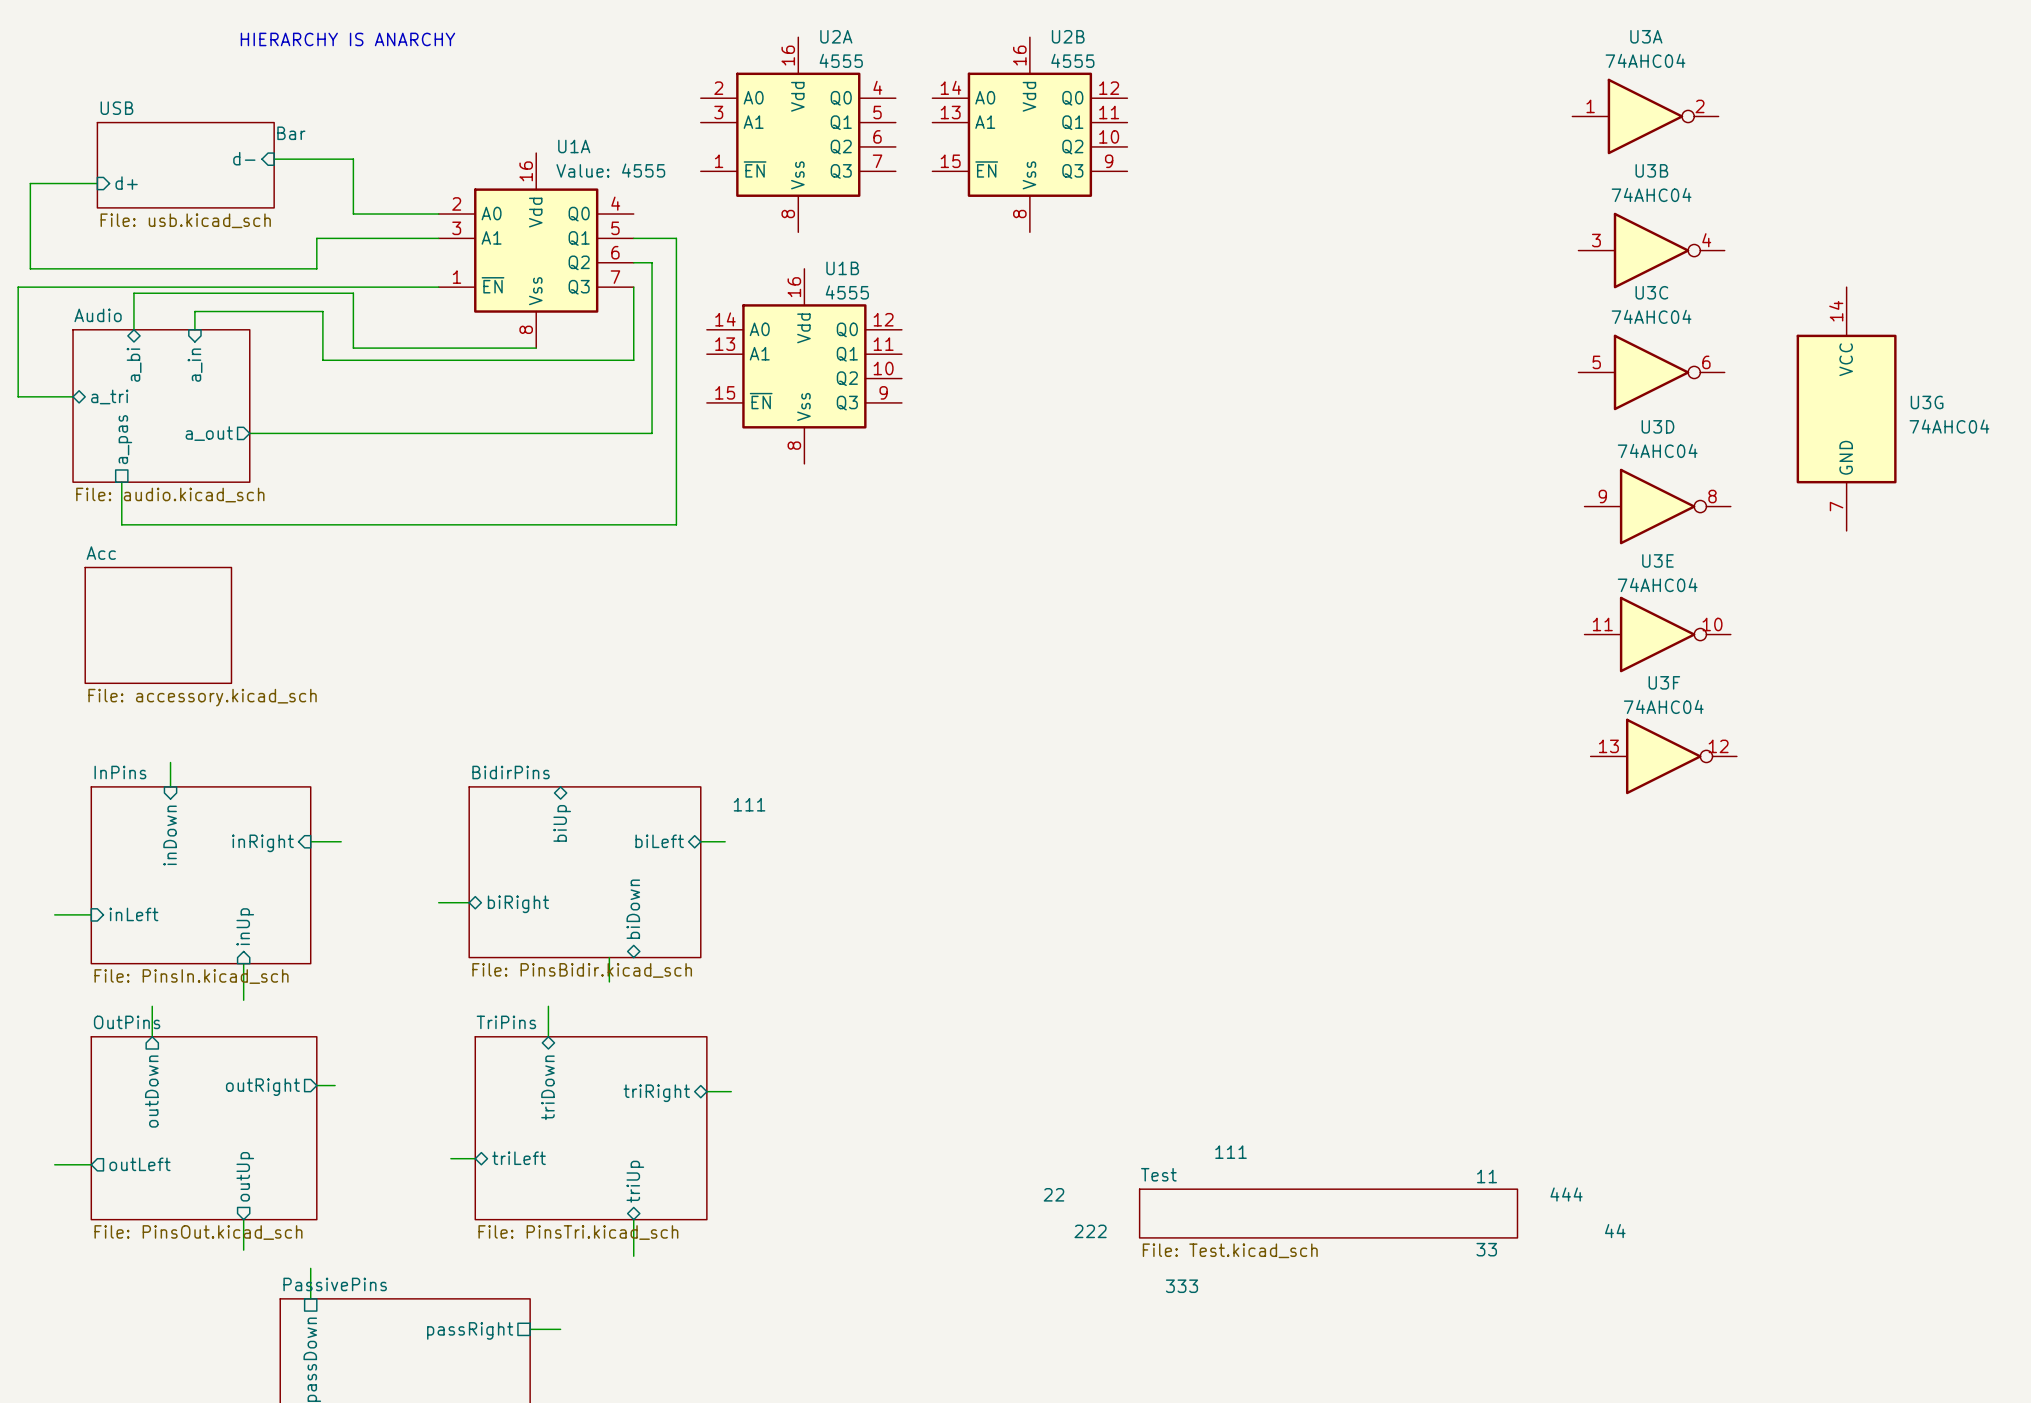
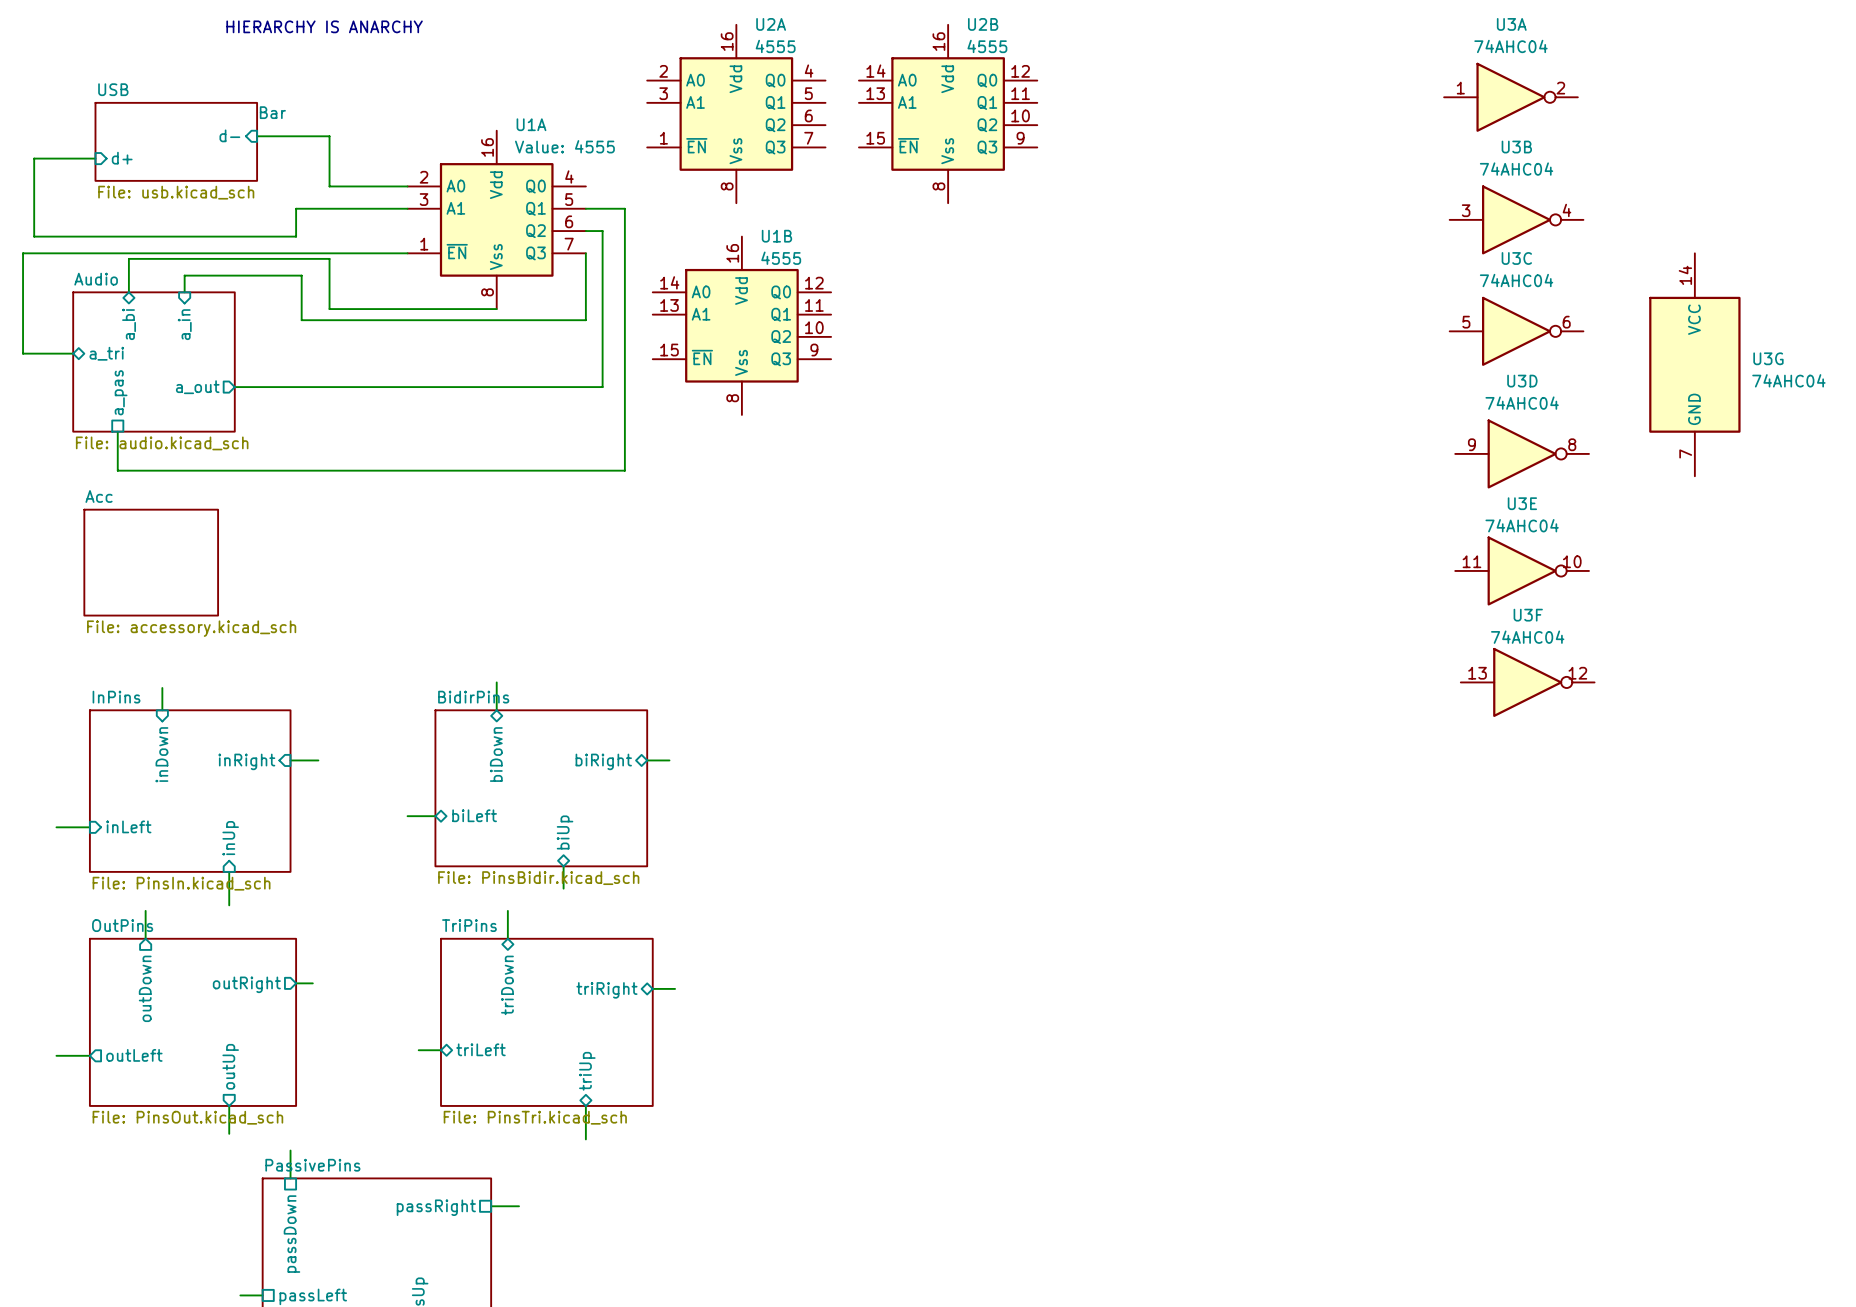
wire: none -> (496, 682) (496, 710)
sheet BidirPins text: 111 (749, 804) -> none
sheet pin rotation: 0° (562, 823) -> 180° (565, 832)
sheet pin position: biUp (562, 823) -> biUp (565, 832)
sheet pin: biLeft (659, 841) -> biRight (603, 761)
sheet pin: biRight (518, 904) -> biLeft (474, 815)
sheet pin rotation: 0° (633, 909) -> 180° (496, 754)
sheet pin position: biDown (633, 909) -> biDown (496, 754)
sheet Test: File: Test.kicad_sch (1328, 1213) -> none

